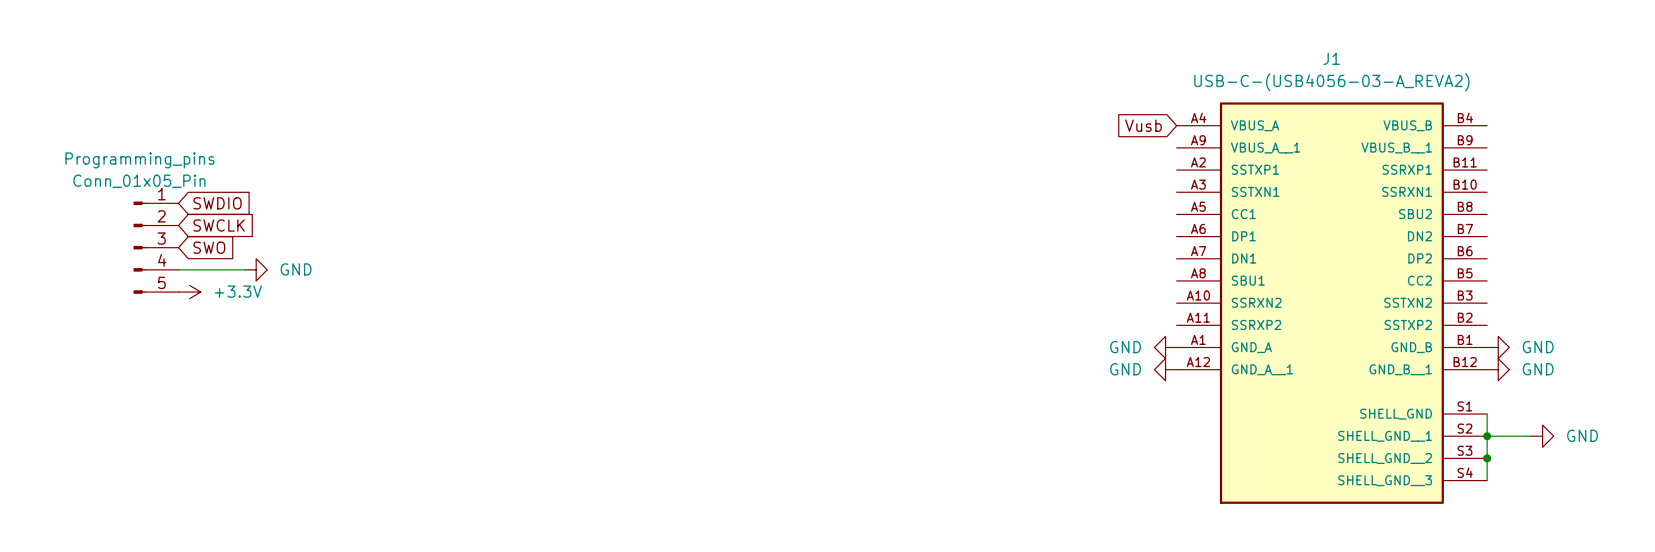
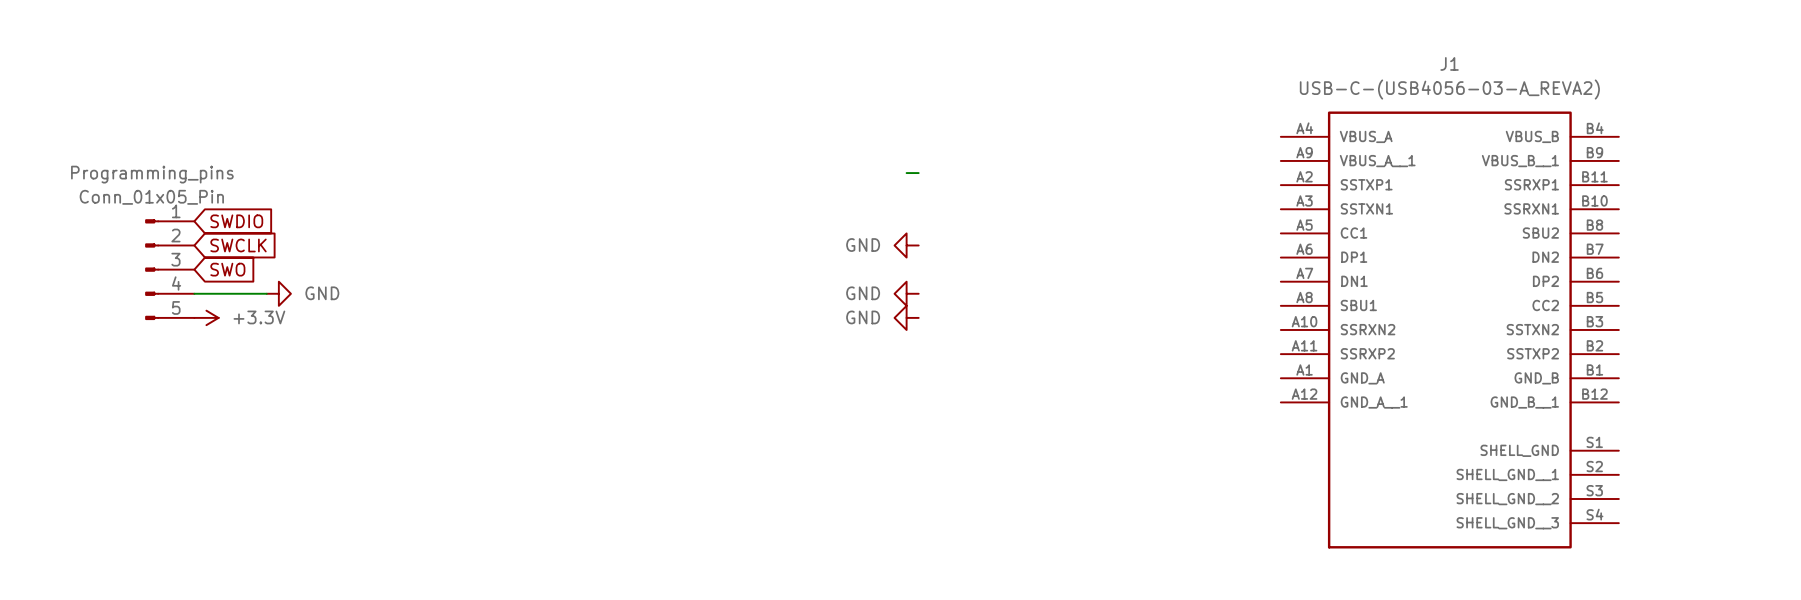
global label: Vusb (1143, 125) -> none
wire: none -> (906, 173) (918, 173)
power symbol: none -> GND (906, 245)
power symbol: none -> GND (906, 293)
power symbol: none -> GND (906, 317)
power symbol: GND (1165, 347) -> none
power symbol: GND (1498, 347) -> none
power symbol: GND (1165, 369) -> none
power symbol: GND (1498, 369) -> none
wire: (1487, 414) (1487, 480) -> none
wire: (1487, 436) (1531, 436) -> none
junction: (1487, 436) -> none
power symbol: GND (1542, 436) -> none
junction: (1487, 458) -> none

